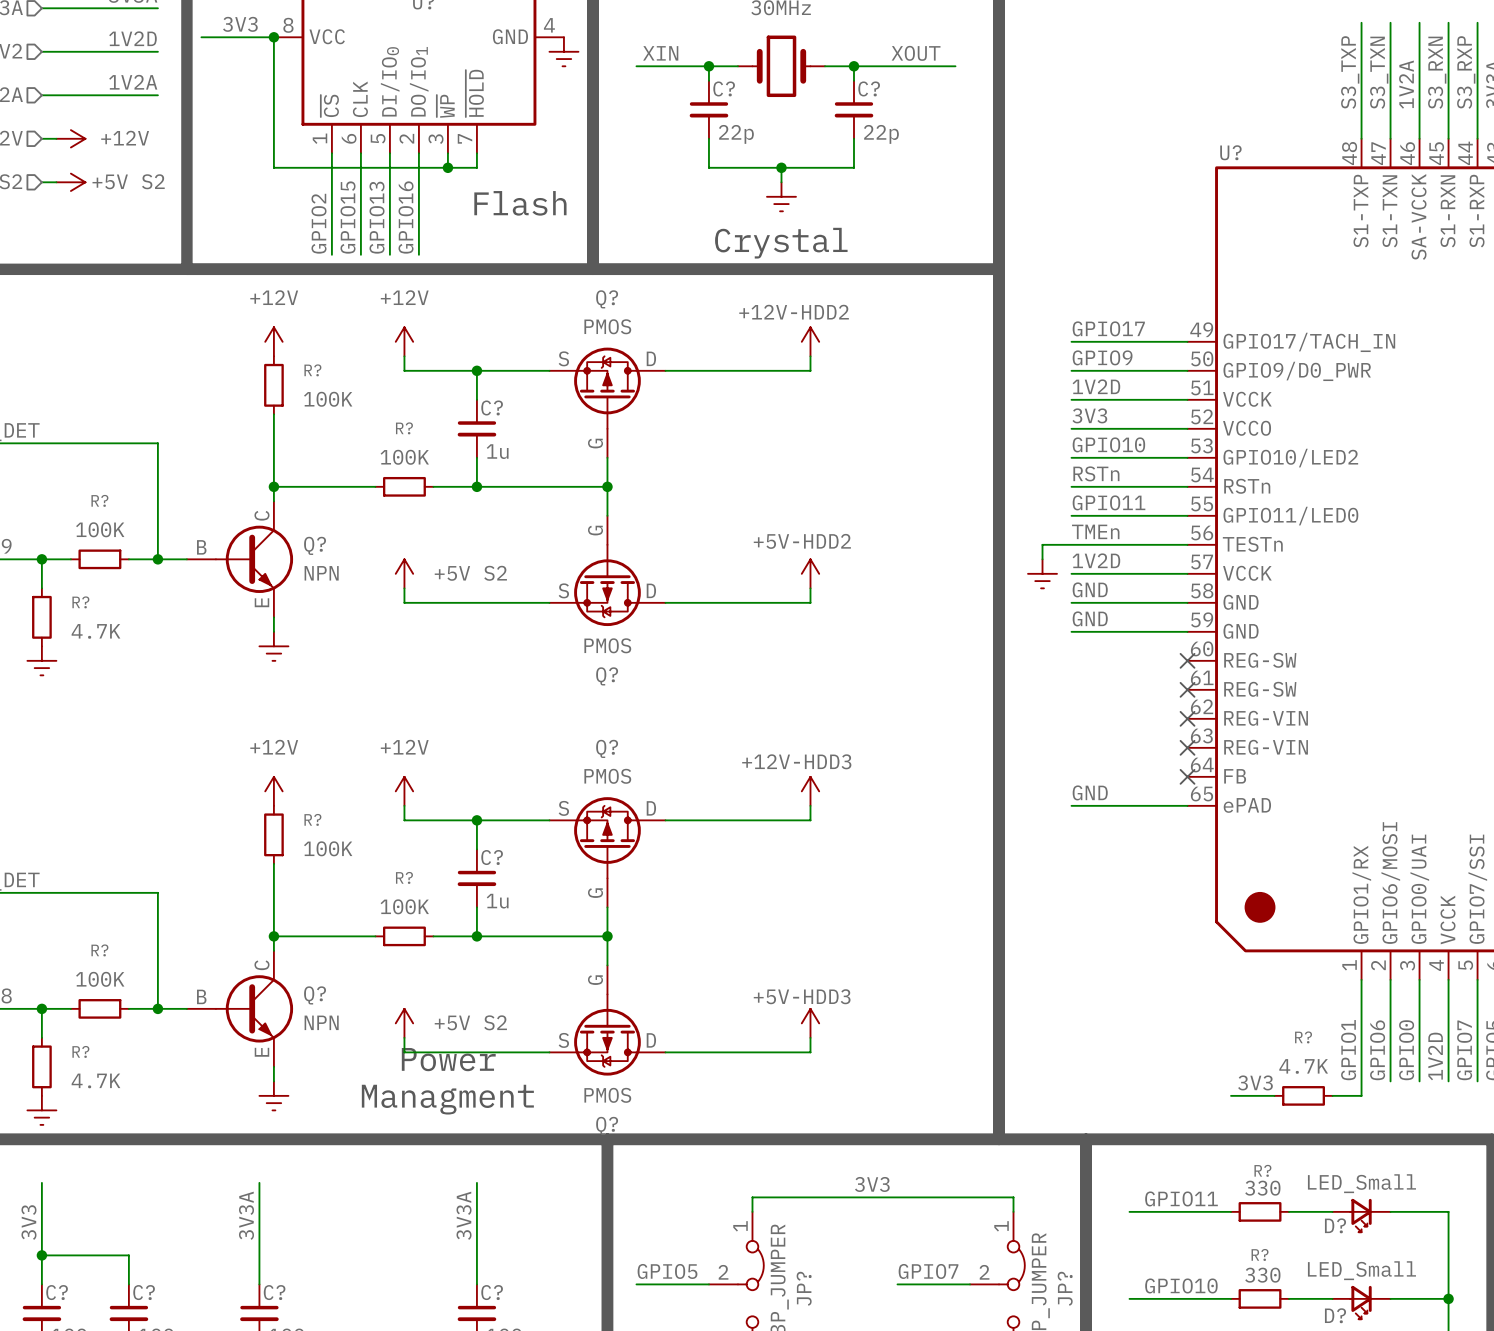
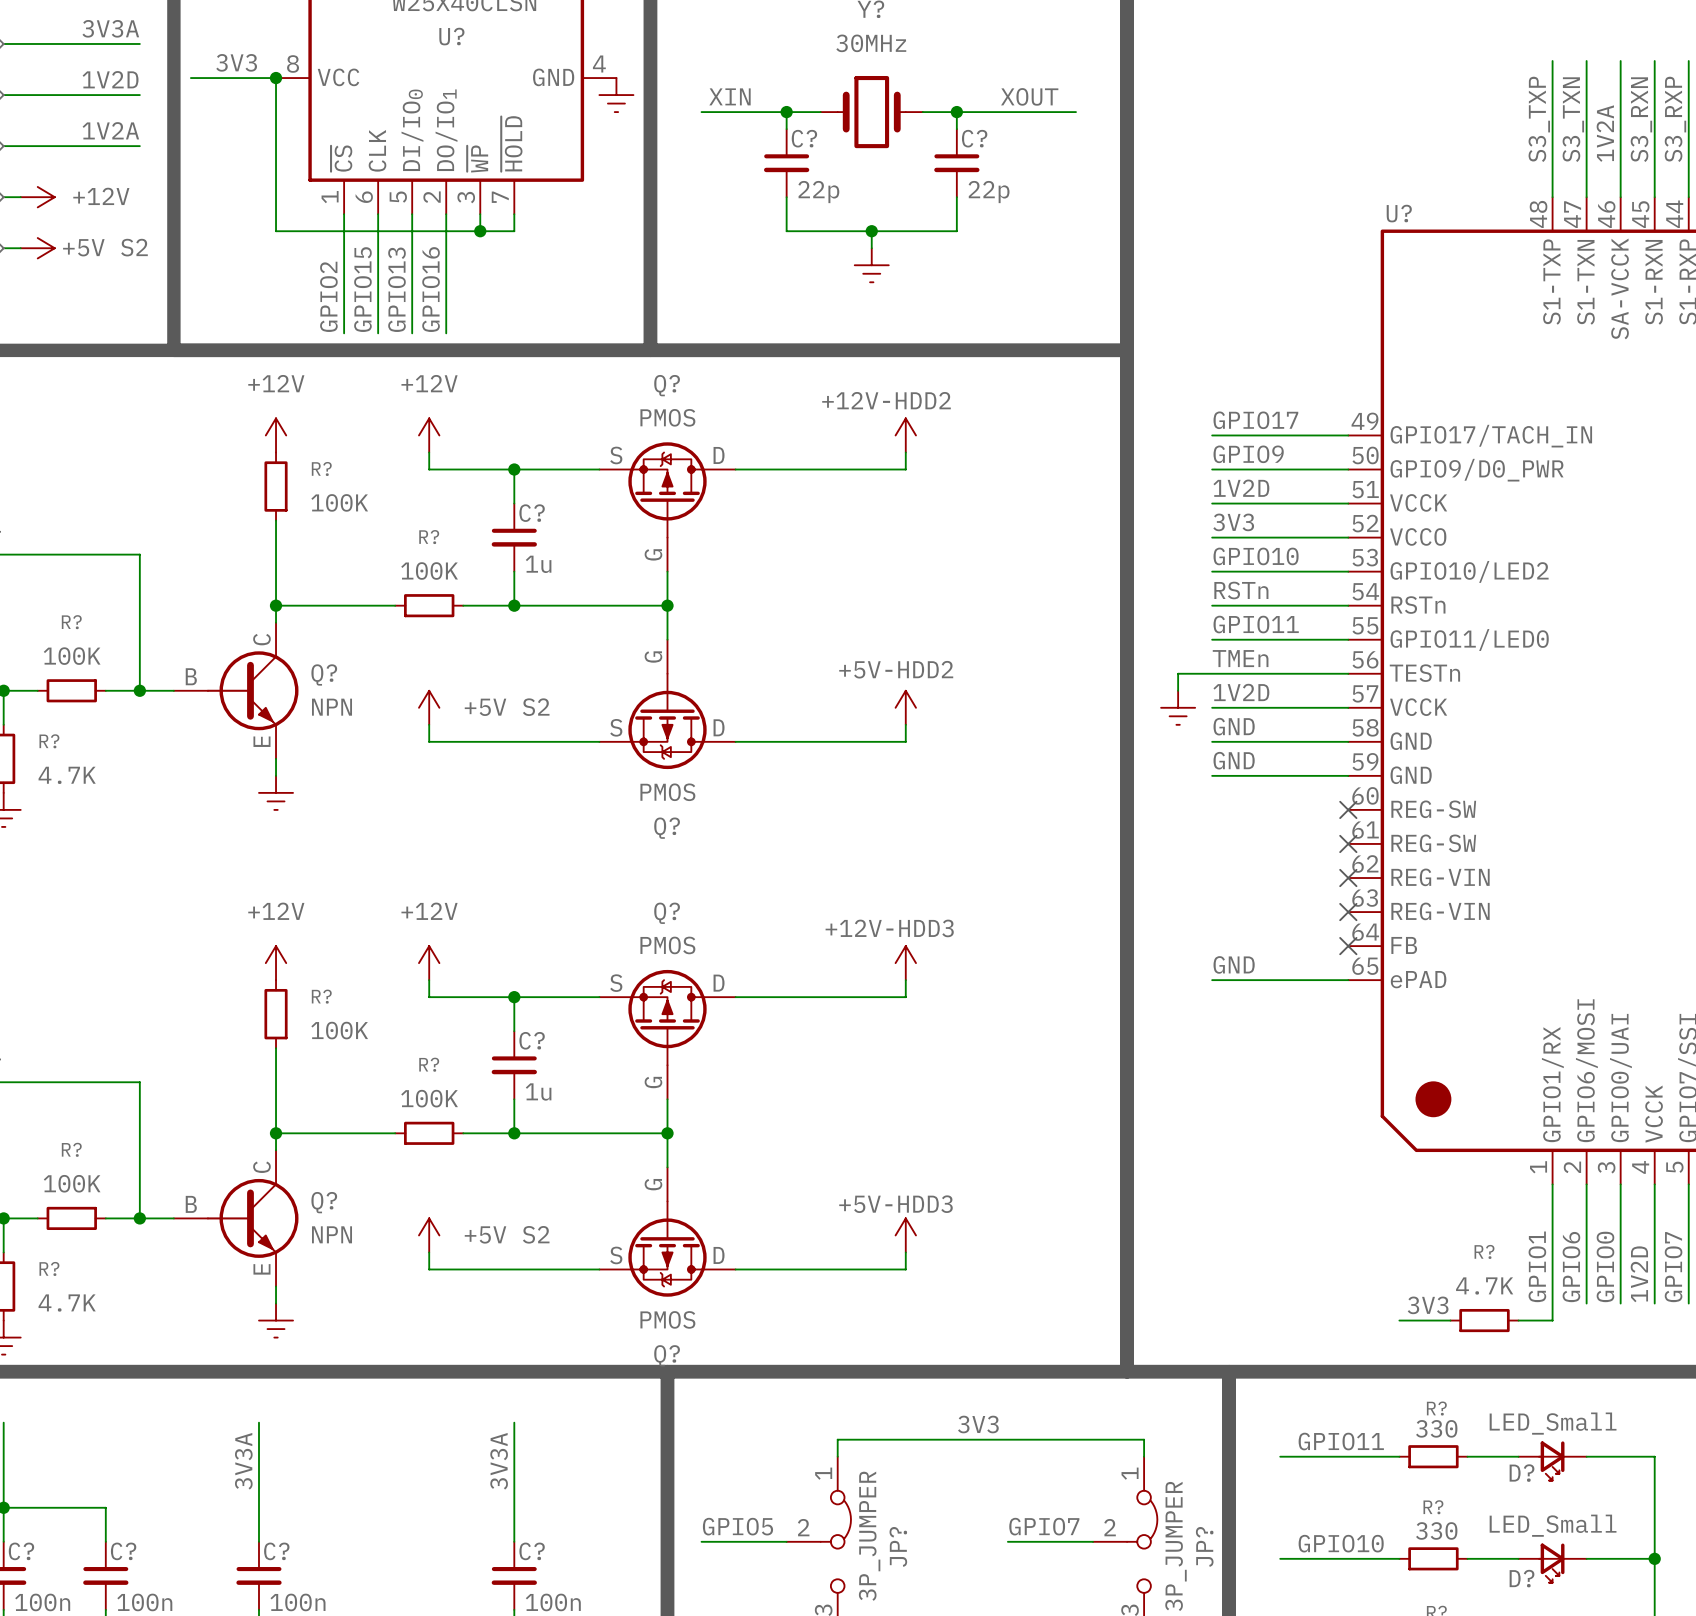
text: Flash (520, 203) -> none
text: Crystal (781, 243) -> none
text: Power (448, 1059) -> none
text: Managment (447, 1099) -> none

